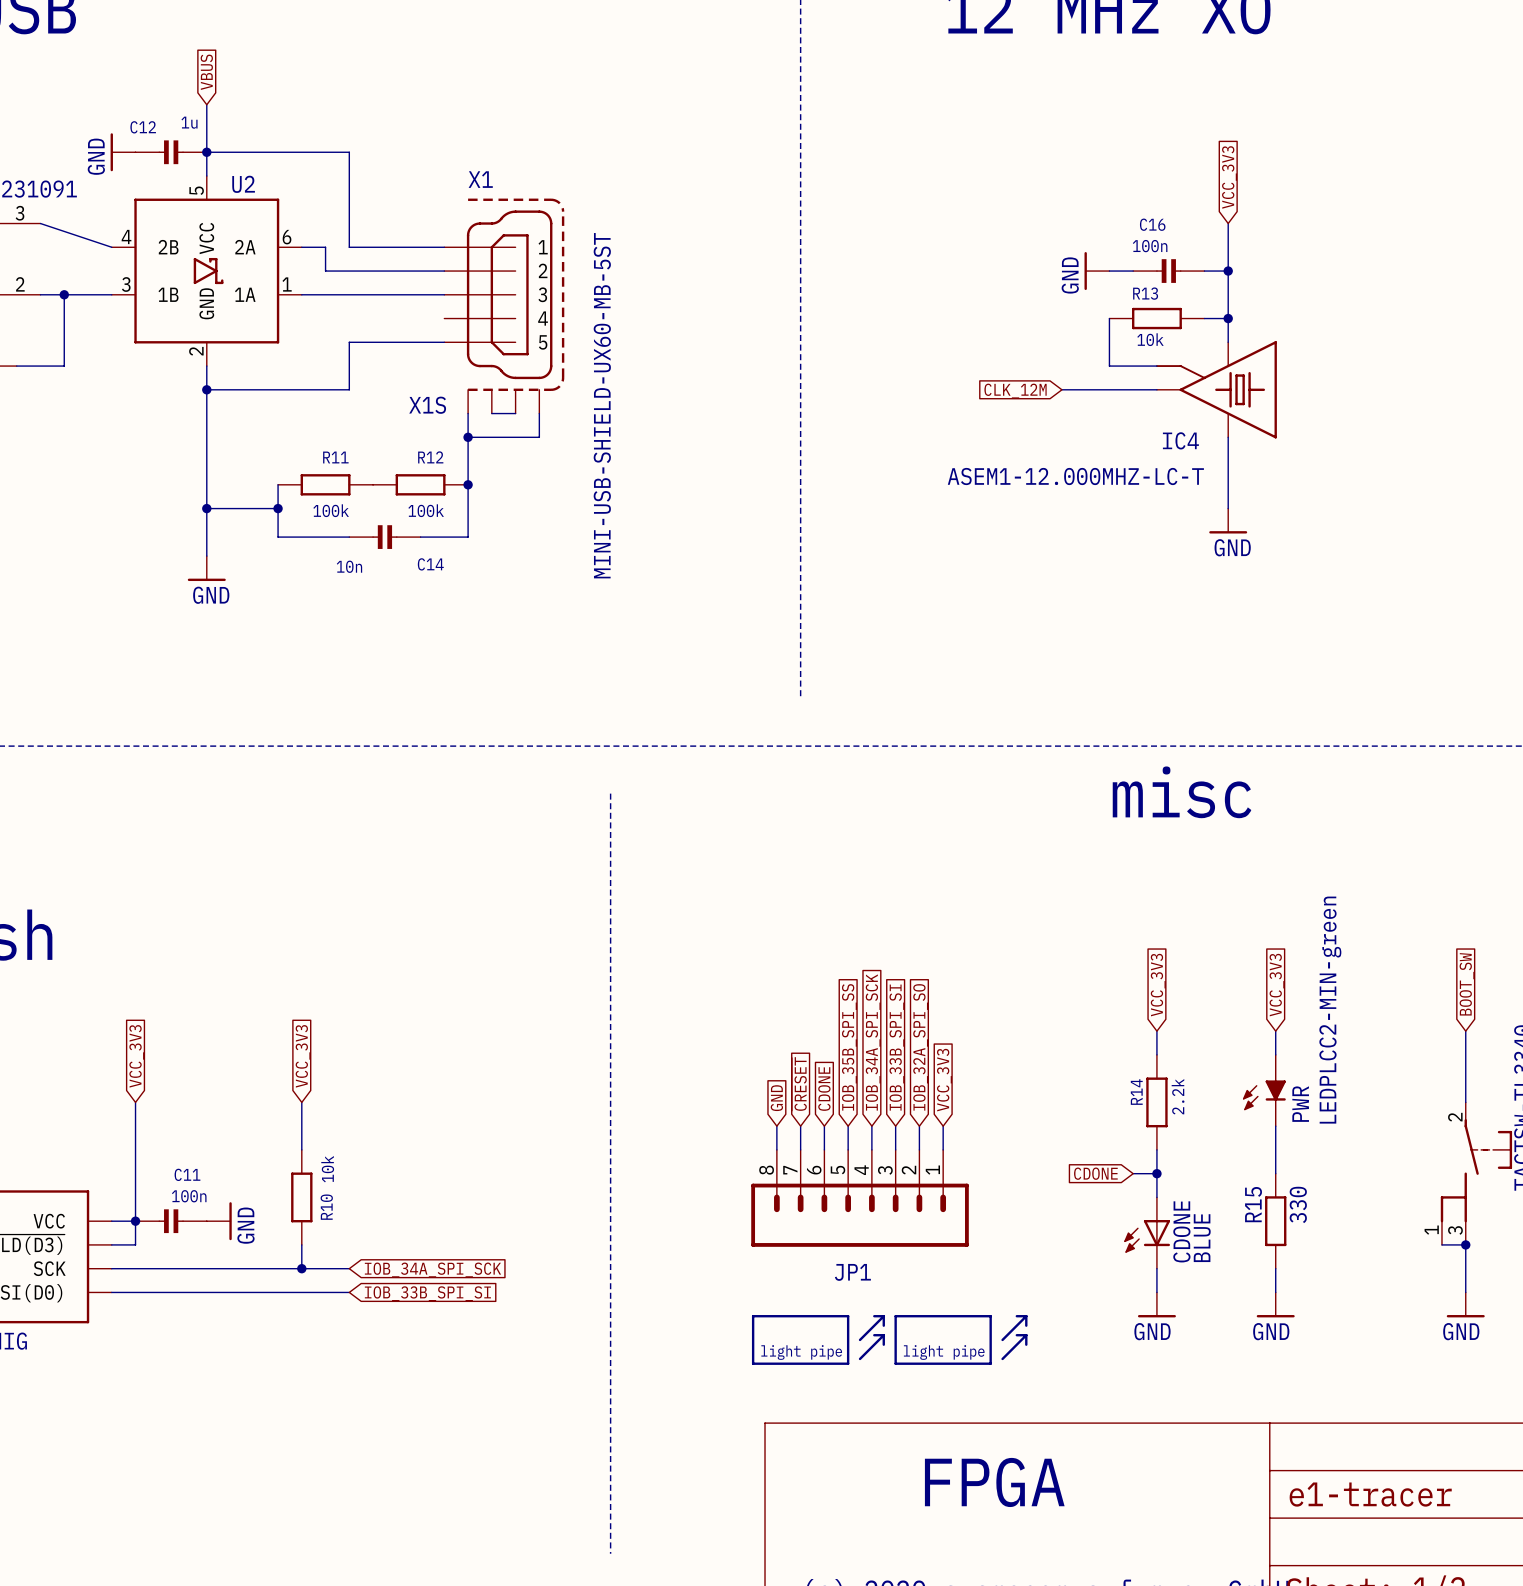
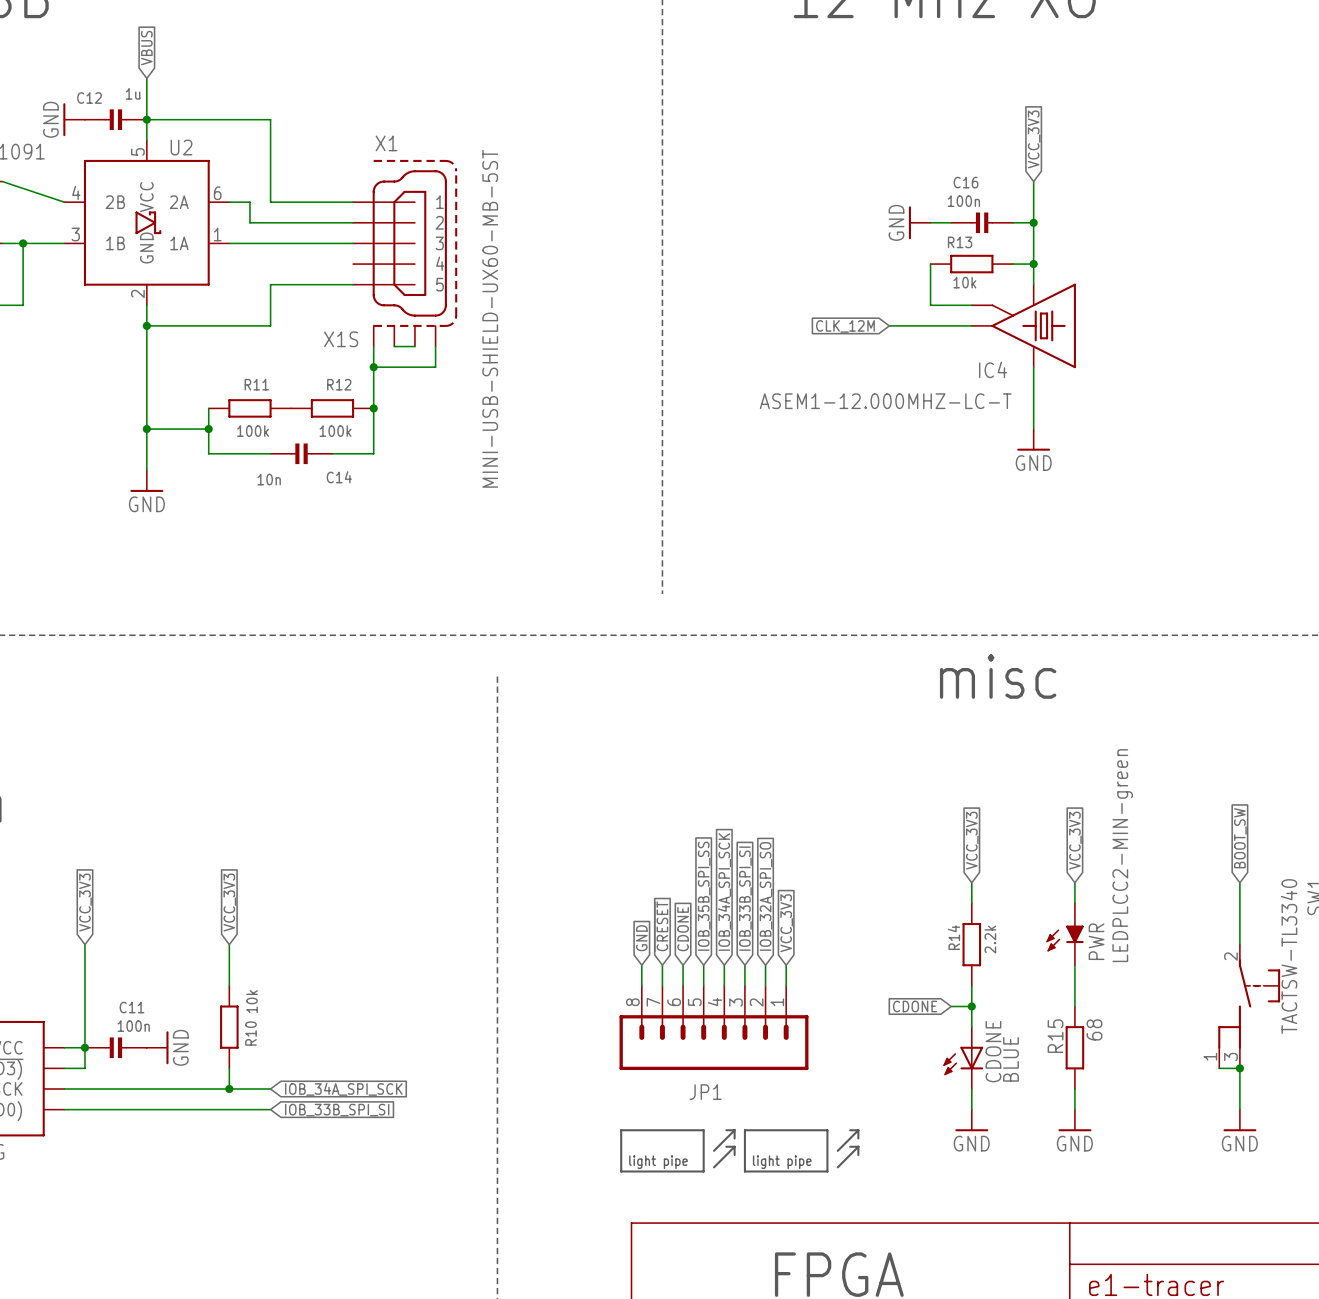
R15 value: 330 (1298, 1204) -> 68 (1094, 1029)

